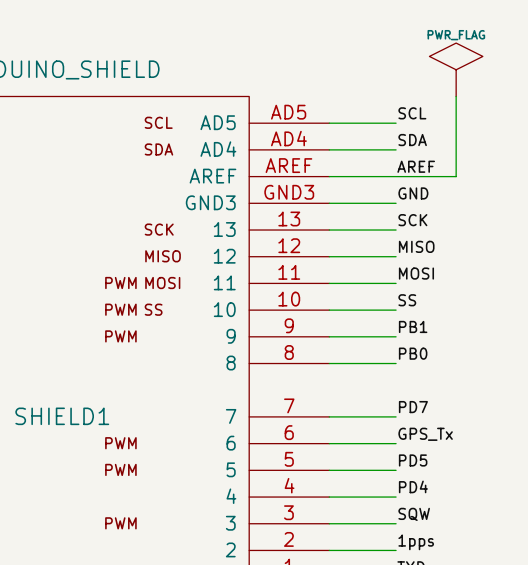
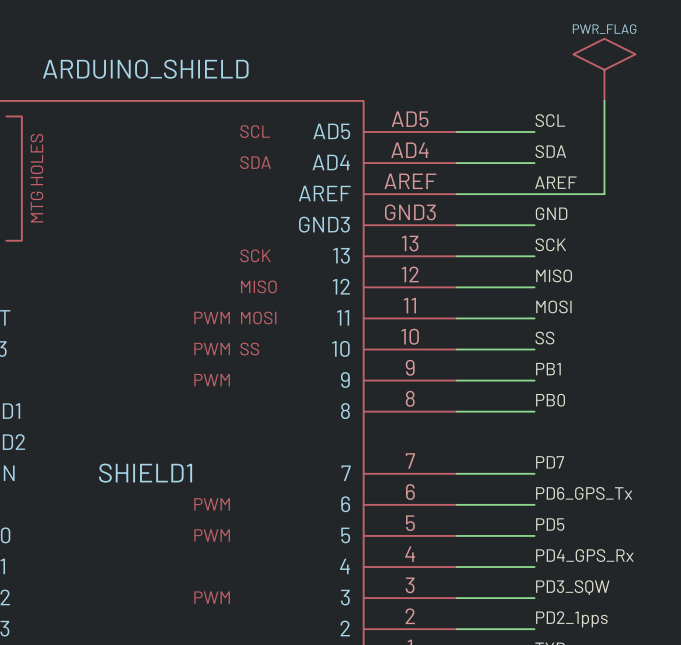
label: GPS_Tx (425, 434) -> PD6_GPS_Tx (584, 493)
label: PD4 (413, 486) -> PD4_GPS_Rx (584, 555)
label: SQW (414, 514) -> PD3_SQW (572, 587)
label: 1pps (416, 542) -> PD2_1pps (571, 619)

